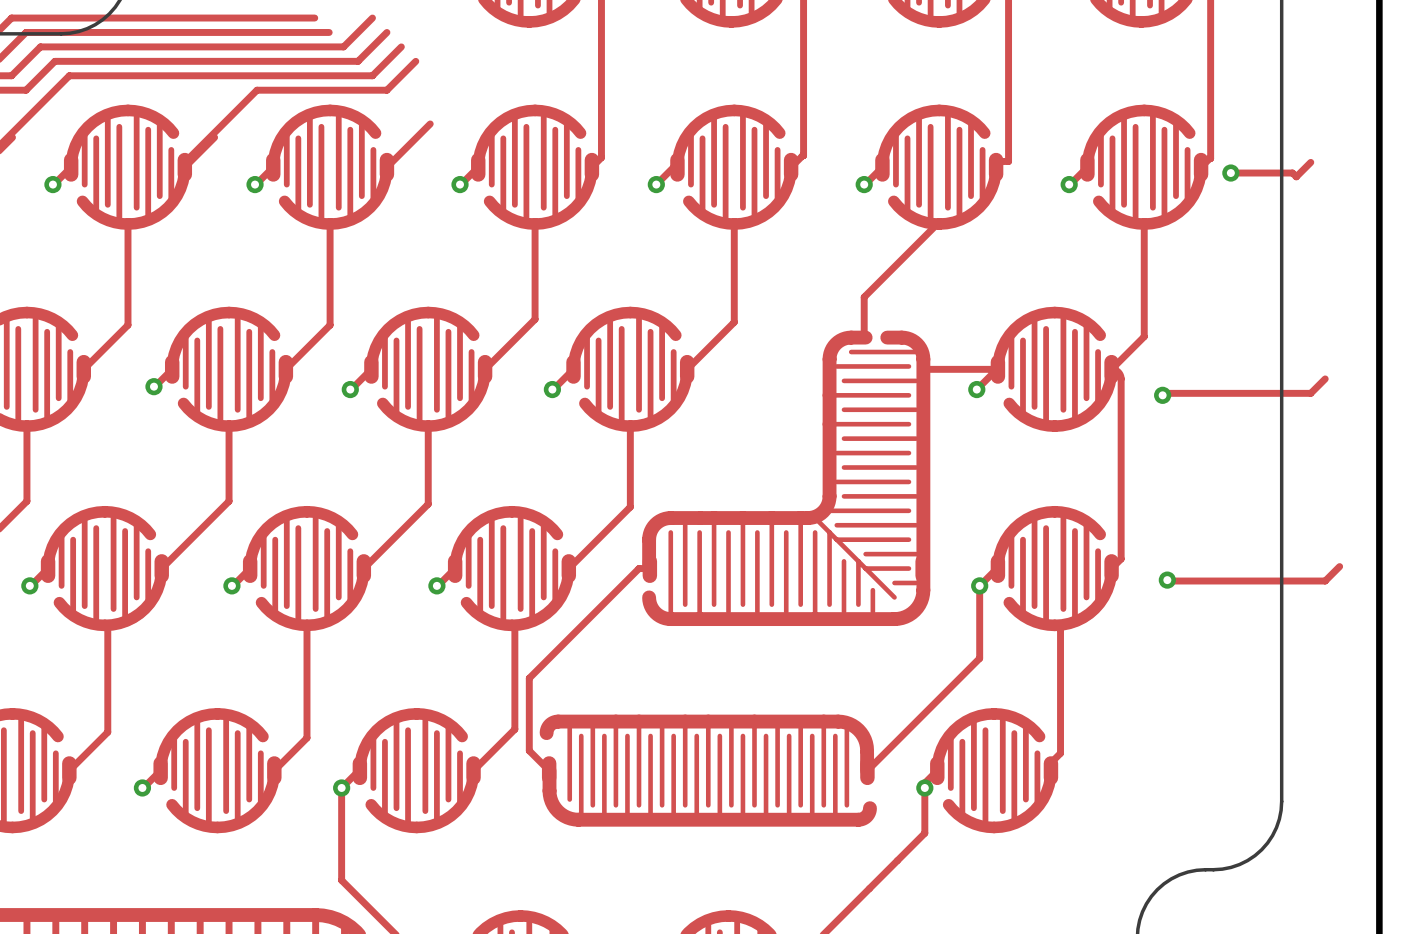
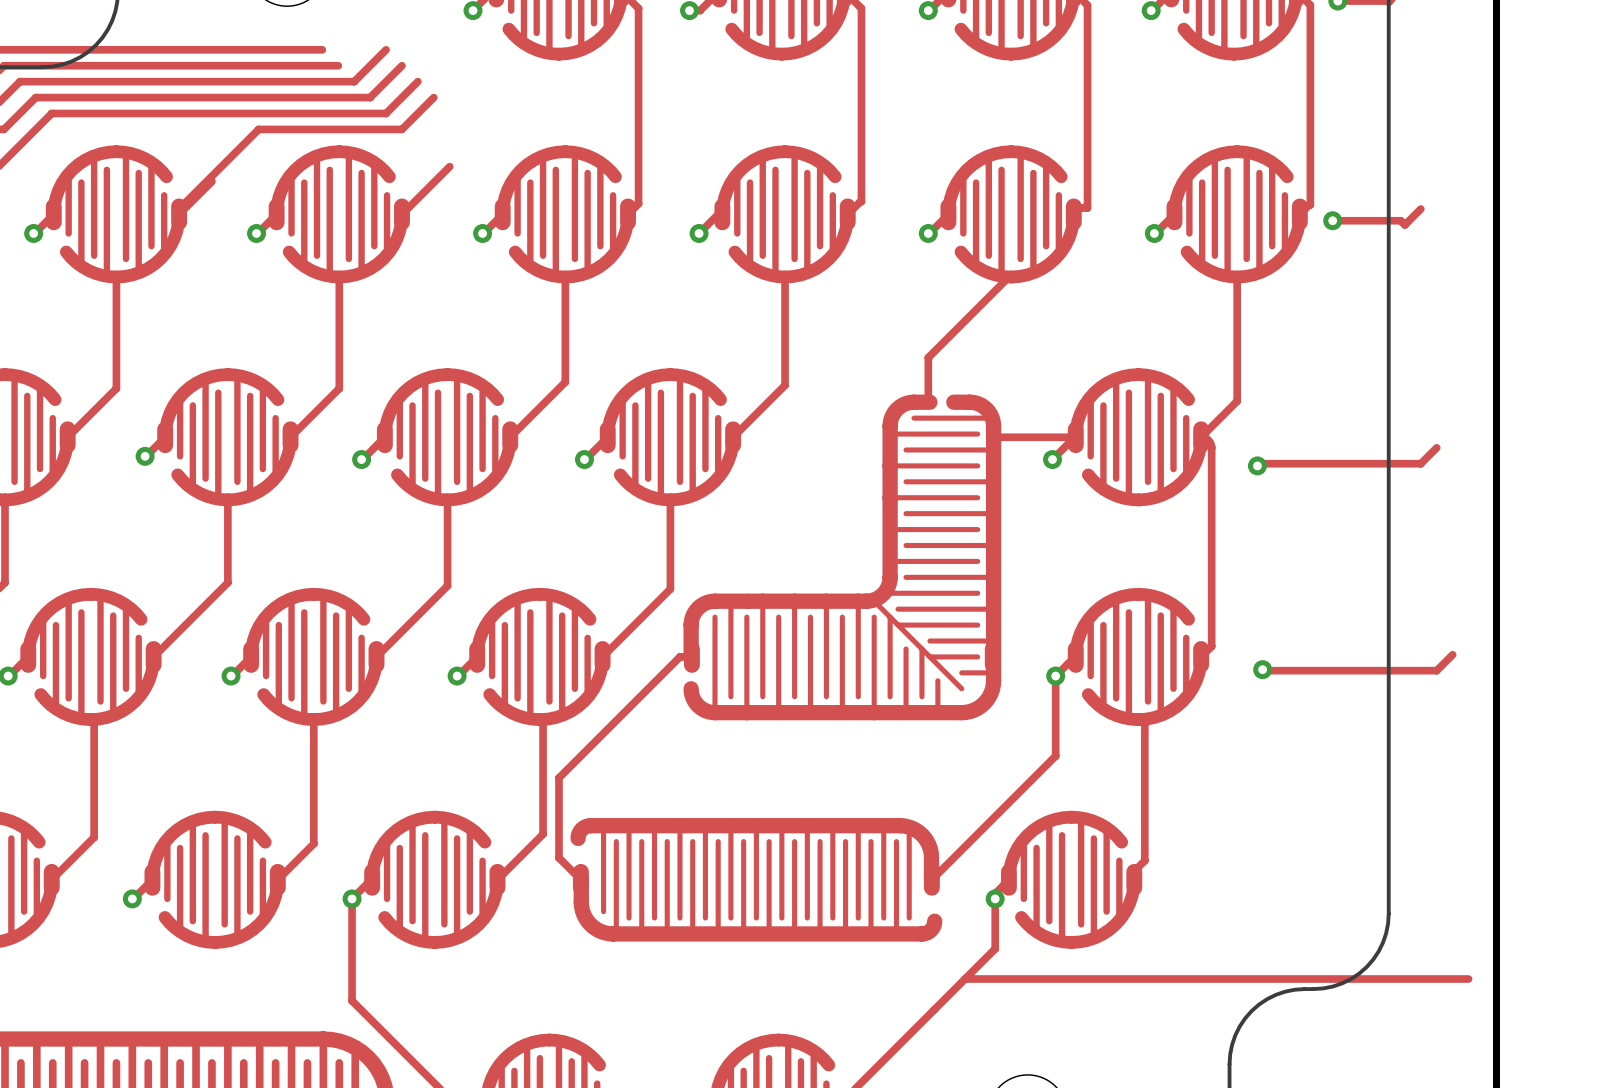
track: none -> (965, 979) (1468, 979)

